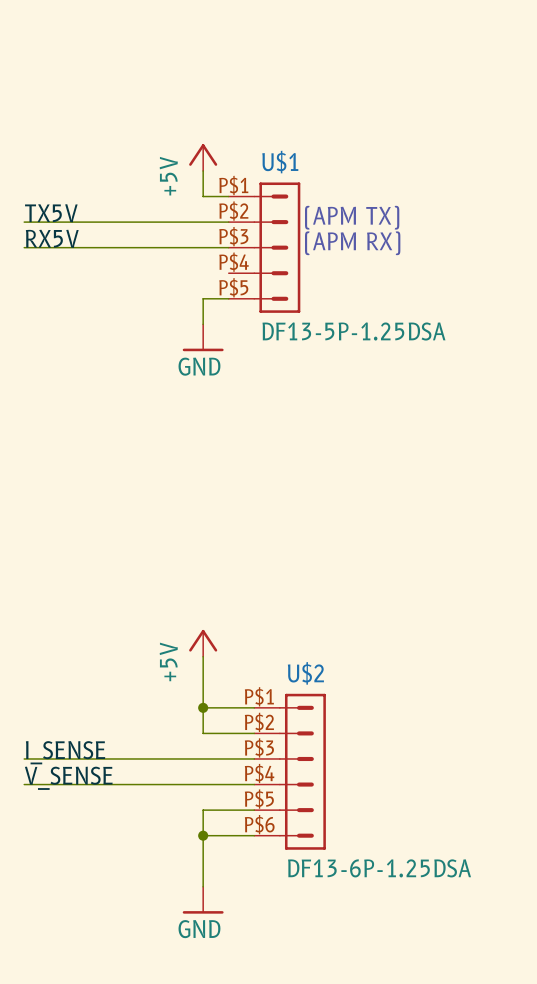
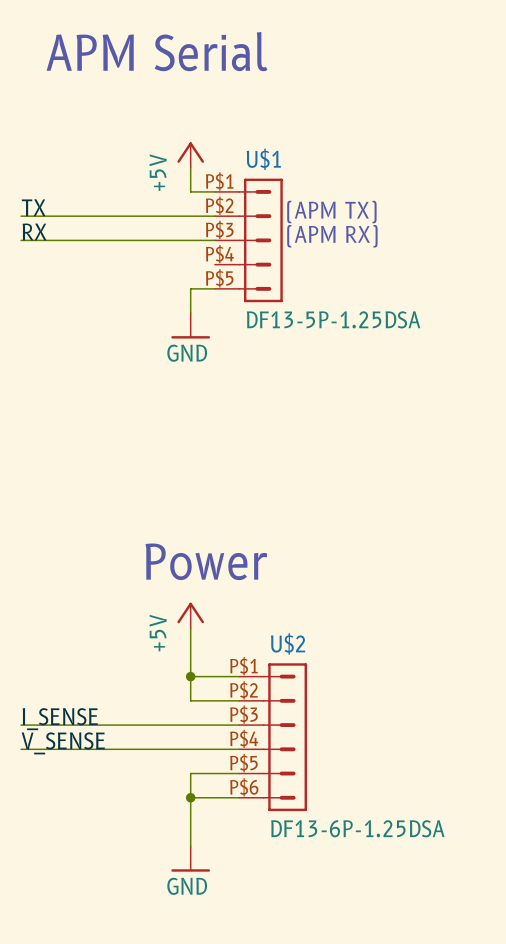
text: none -> APM Serial (157, 51)
label: TX5V (51, 213) -> TX (33, 207)
label: RX5V (52, 238) -> RX (34, 231)
text: none -> Power (206, 561)

